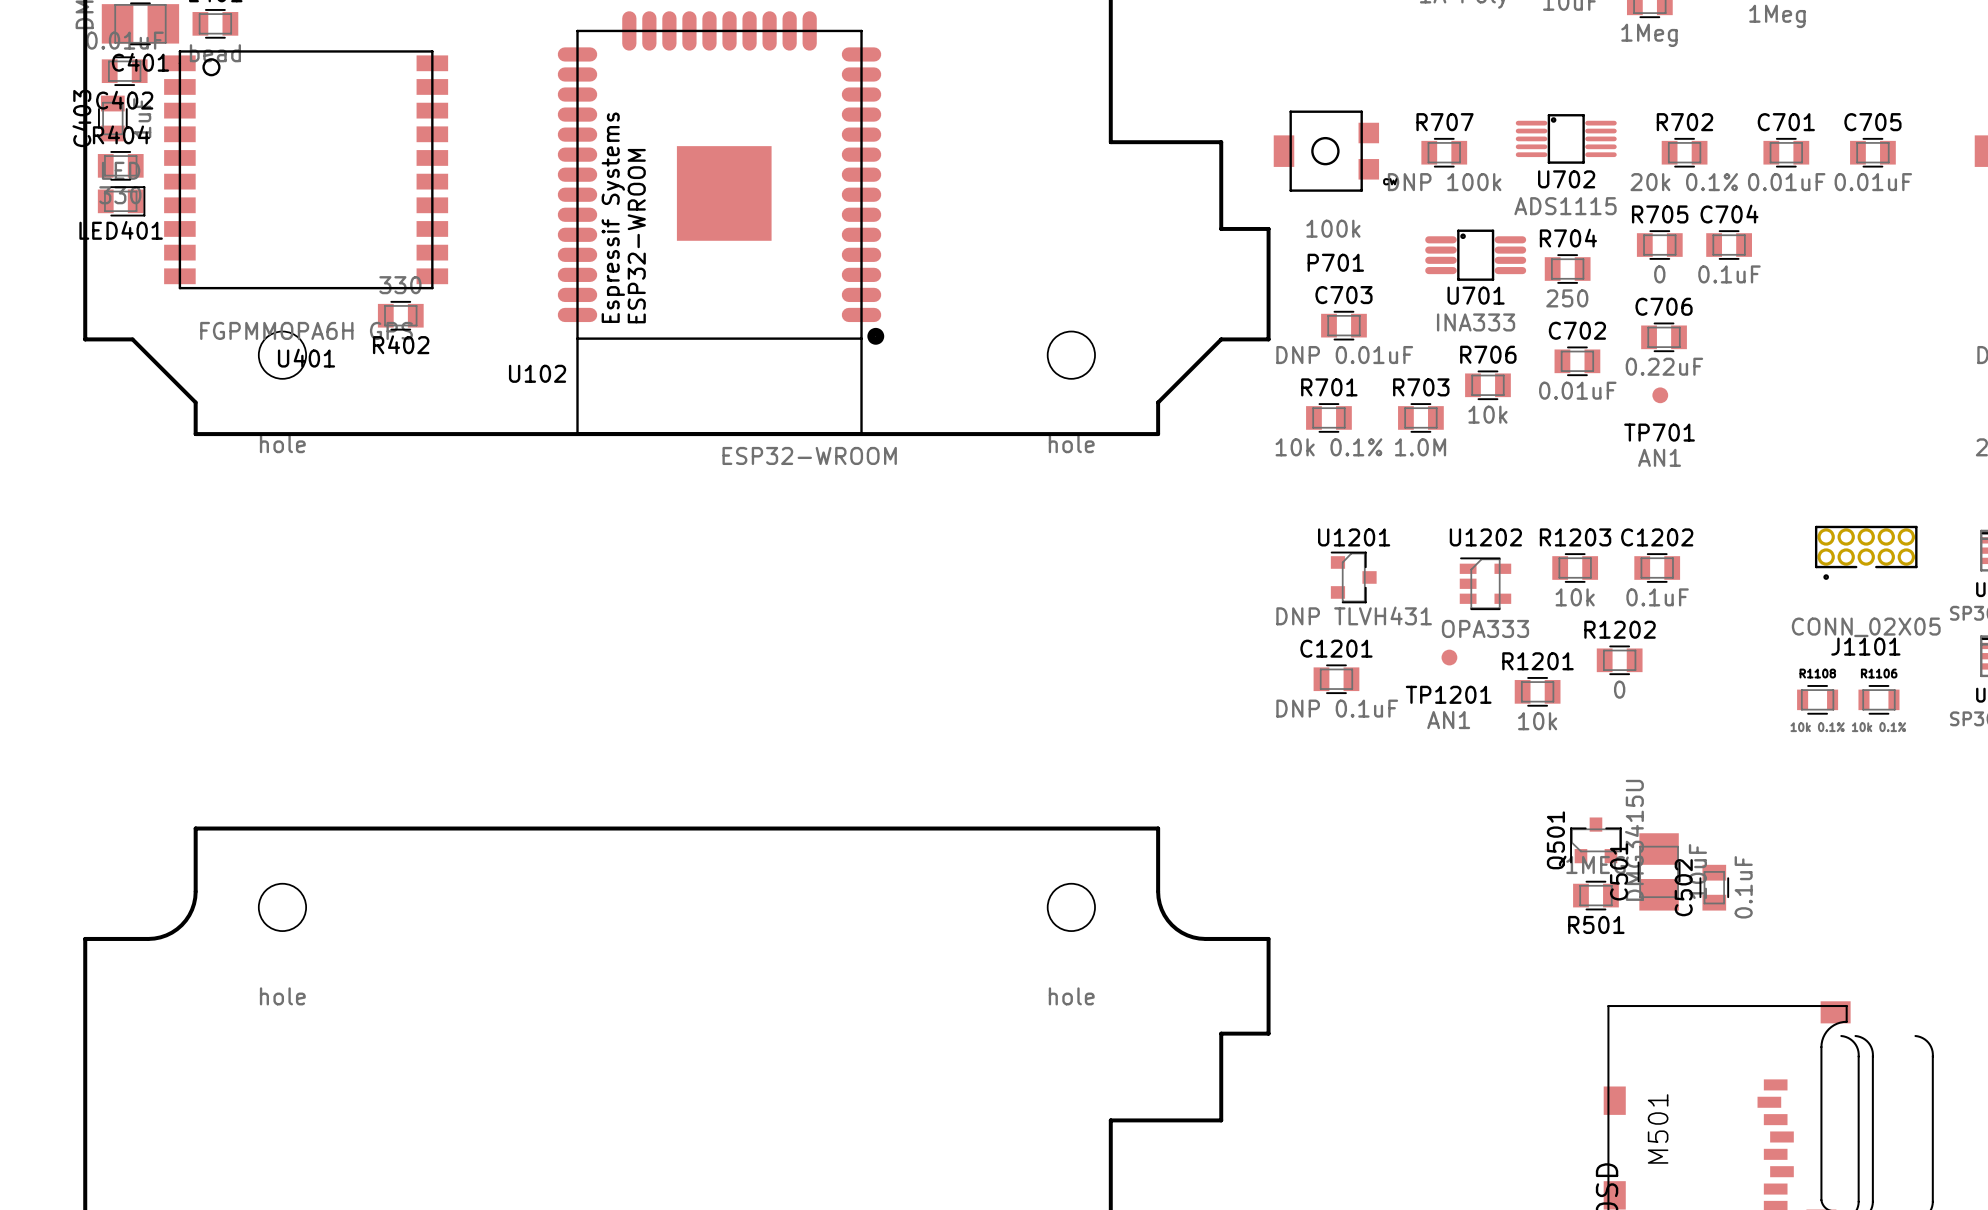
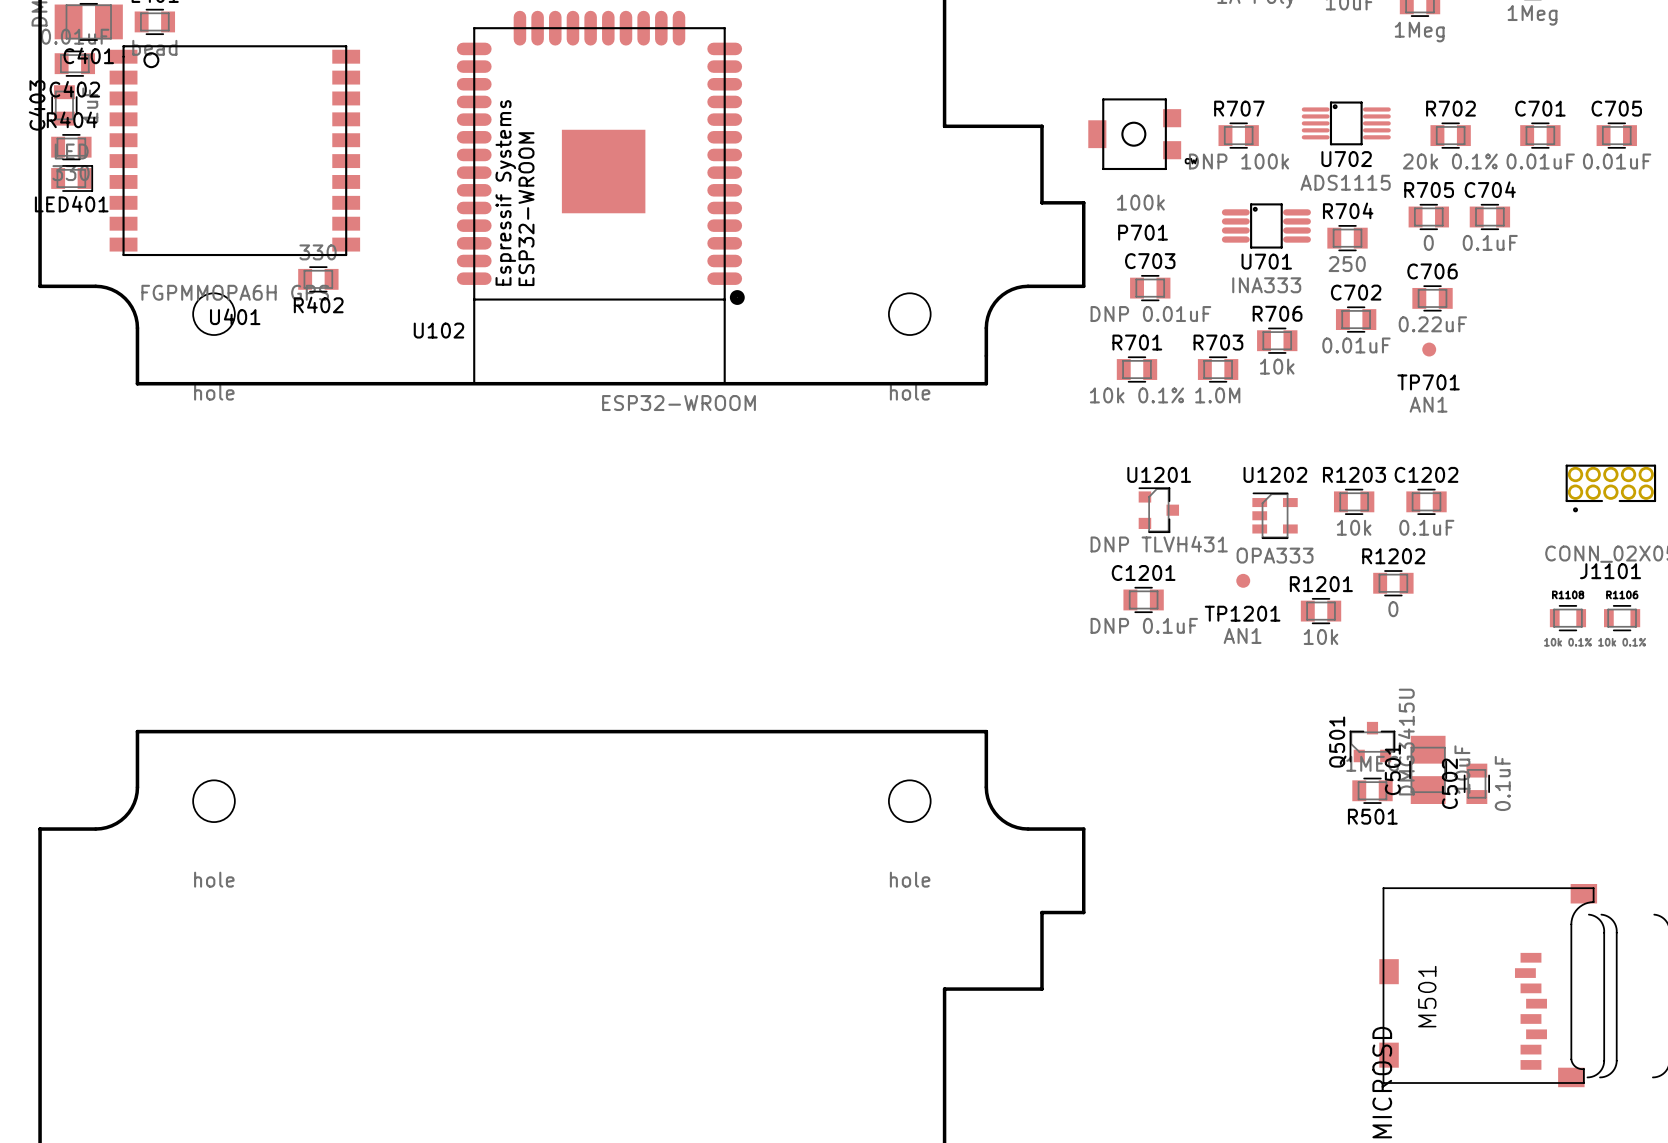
board edge: (85, 323) (85, 339) (132, 339) (195, 402) -> (40, 286) (101, 286) (121, 294) (131, 307) (136, 317) (137, 355)
board edge: (1268, 323) (1268, 339) (1221, 339) (1158, 402) -> (1083, 286) (1022, 286) (1002, 294) (991, 307) (987, 317) (986, 355)

